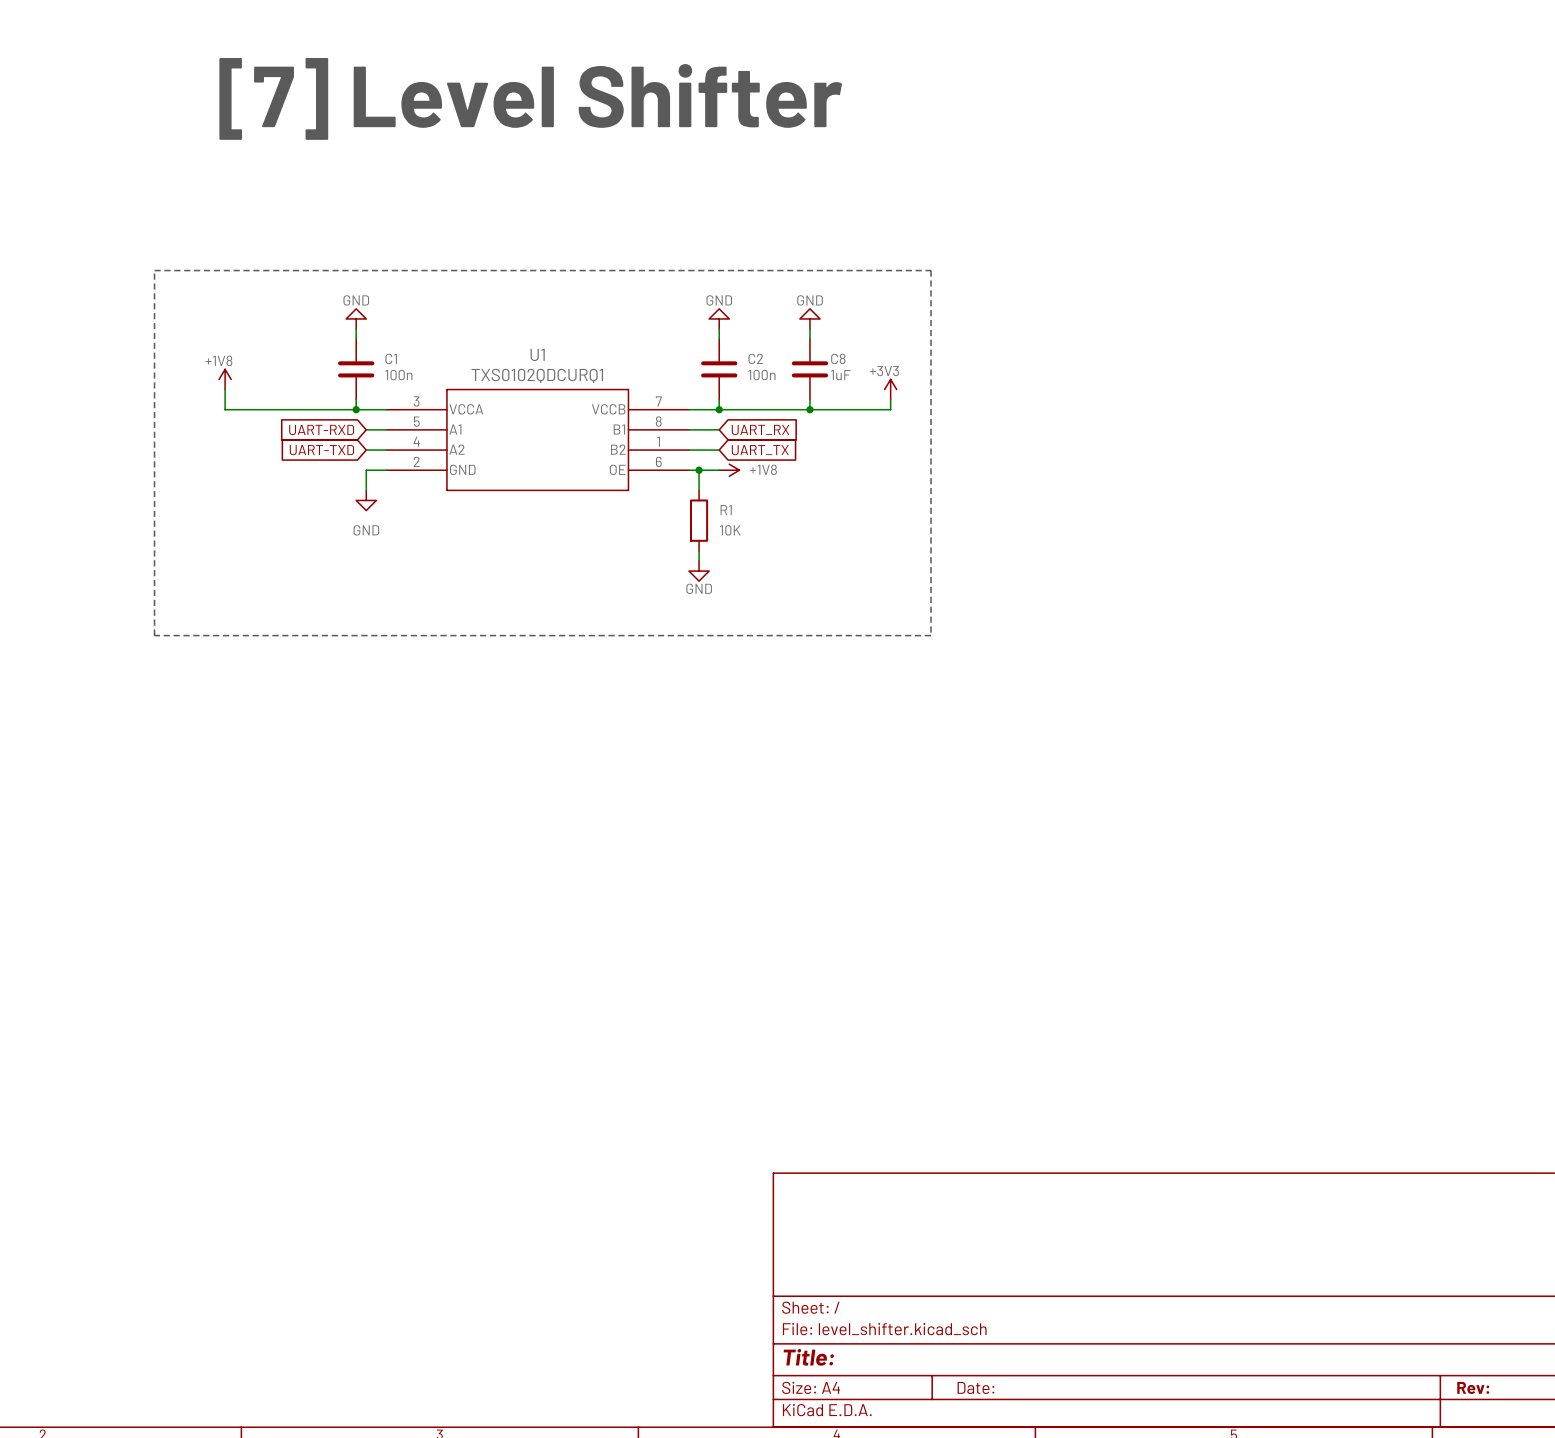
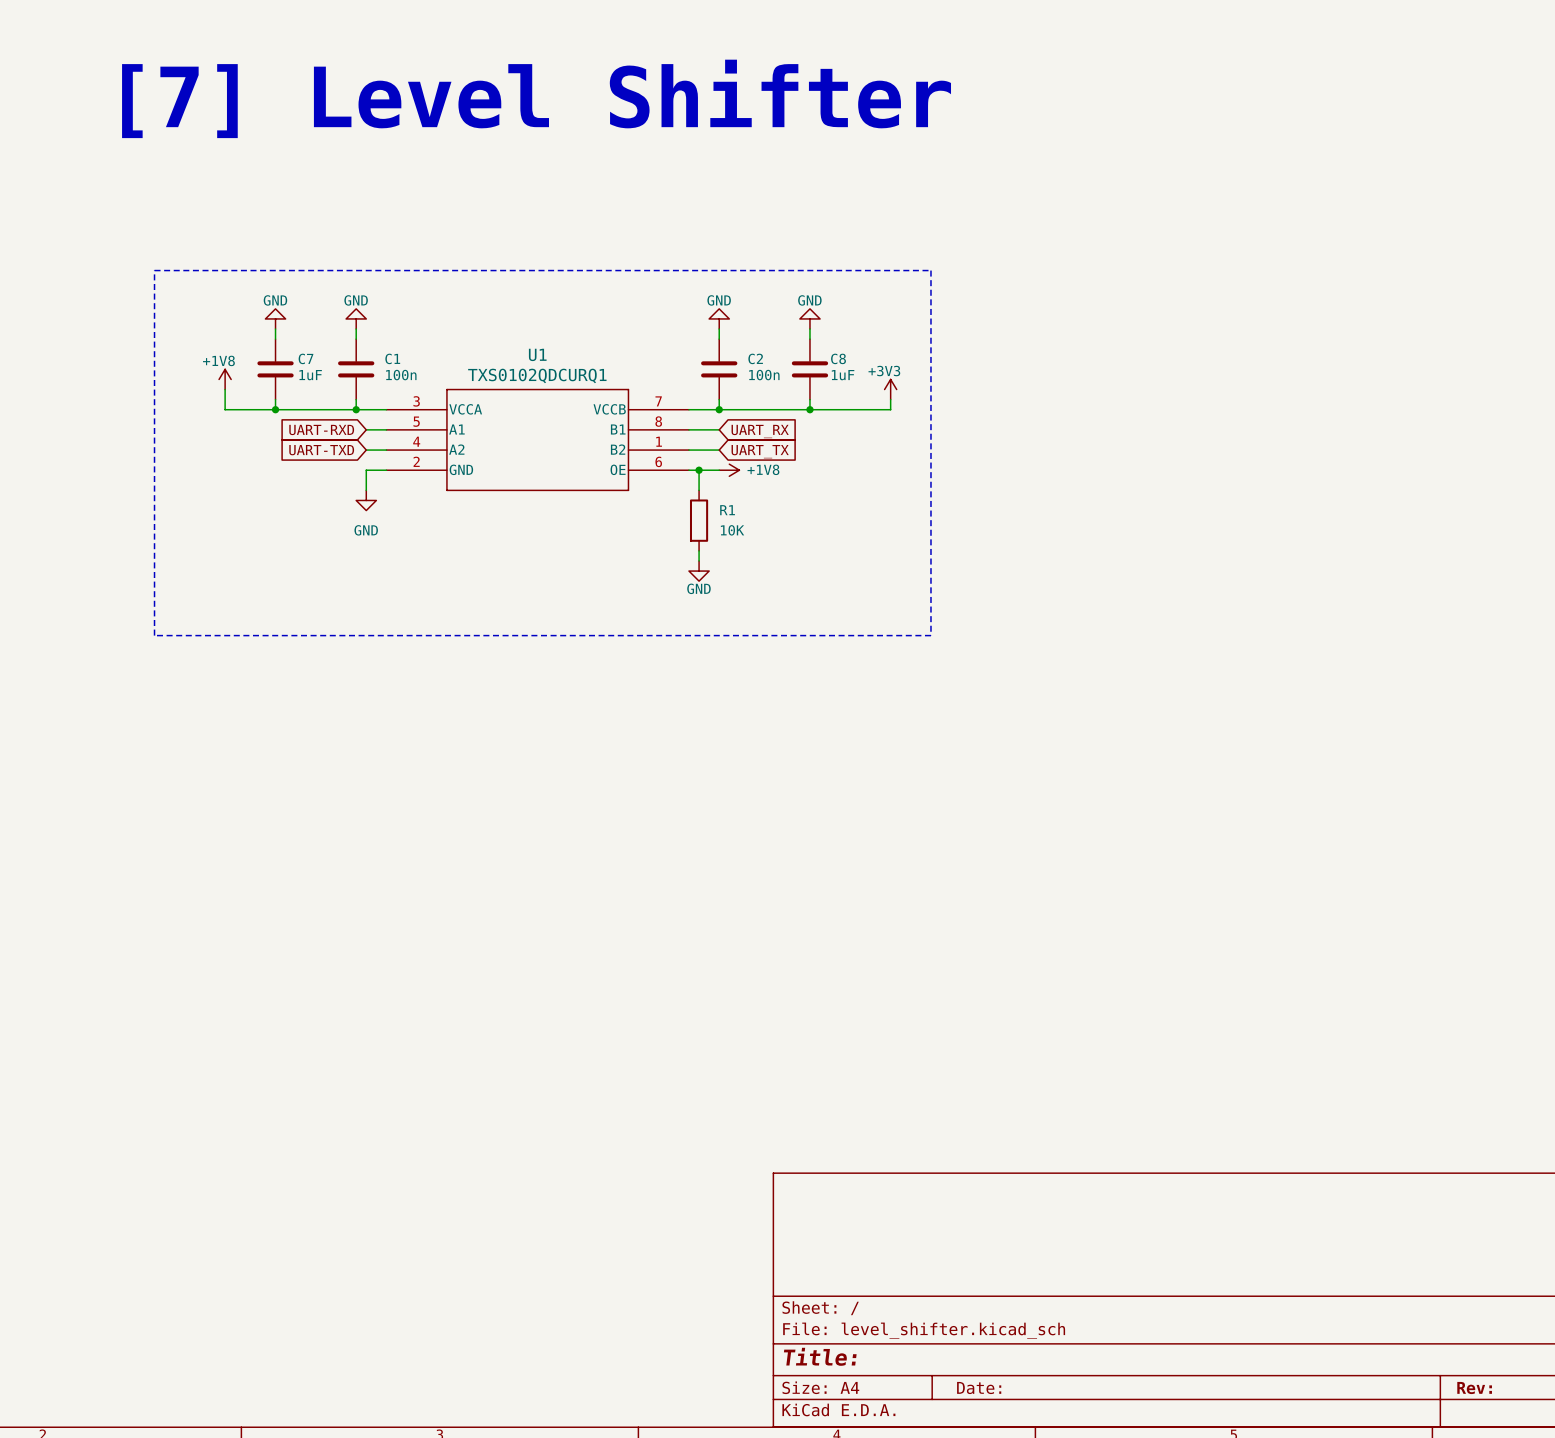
power symbol: none -> GND (275, 318)
wire: none -> (275, 329) (275, 339)
C7: none -> 1uF (275, 369)
wire: none -> (275, 399) (275, 409)
junction: none -> (275, 409)

